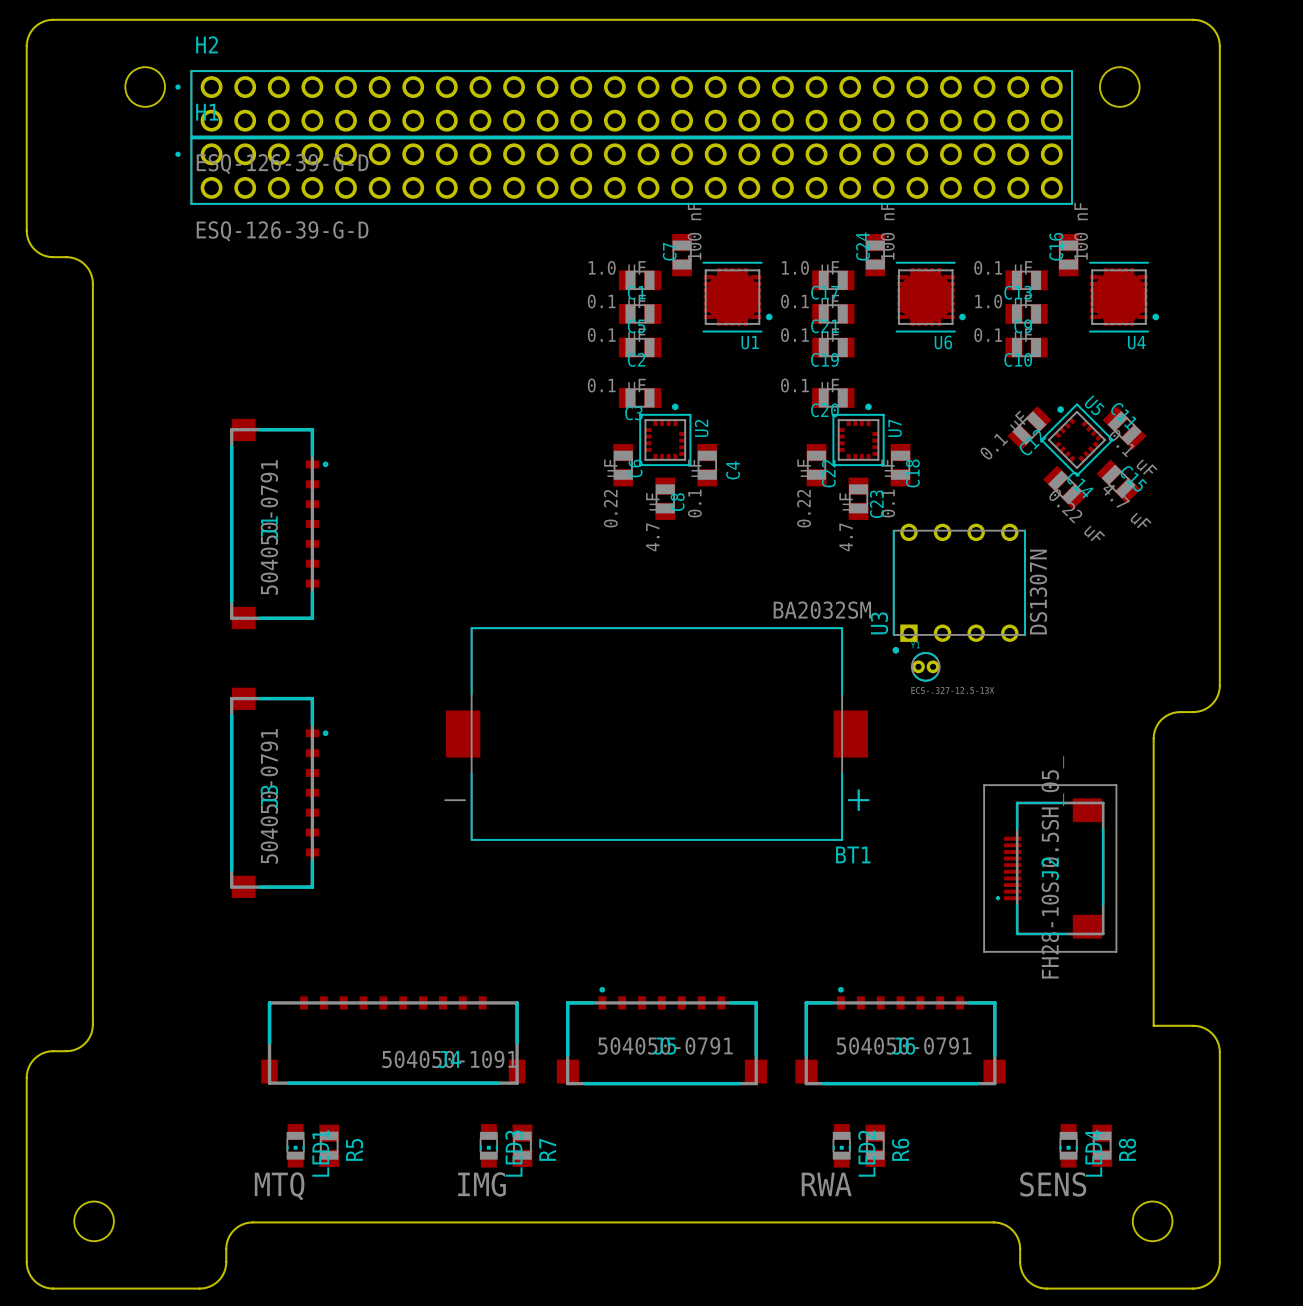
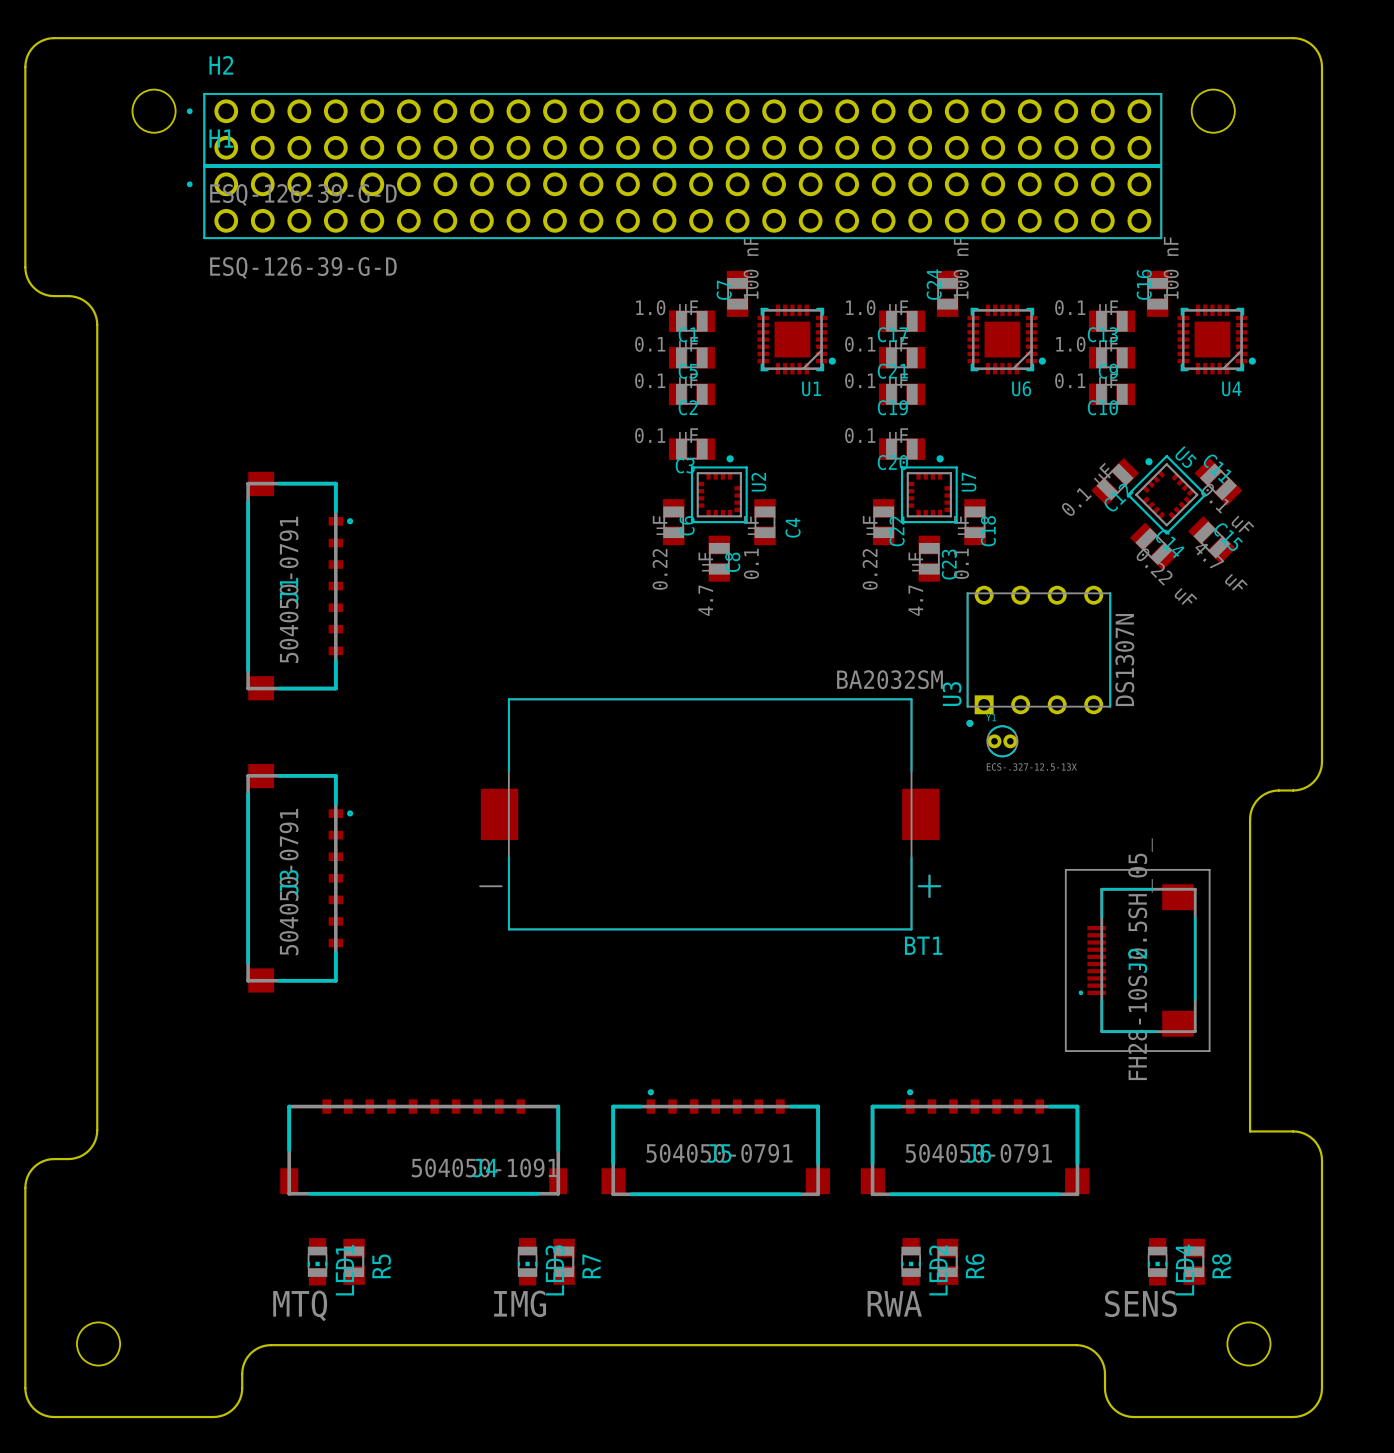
U1 footprint: [702, 261, 773, 333] -> [757, 304, 836, 375]
U6 footprint: [895, 261, 966, 333] -> [967, 304, 1046, 375]
U4 footprint: [1088, 261, 1160, 333] -> [1177, 304, 1256, 375]

